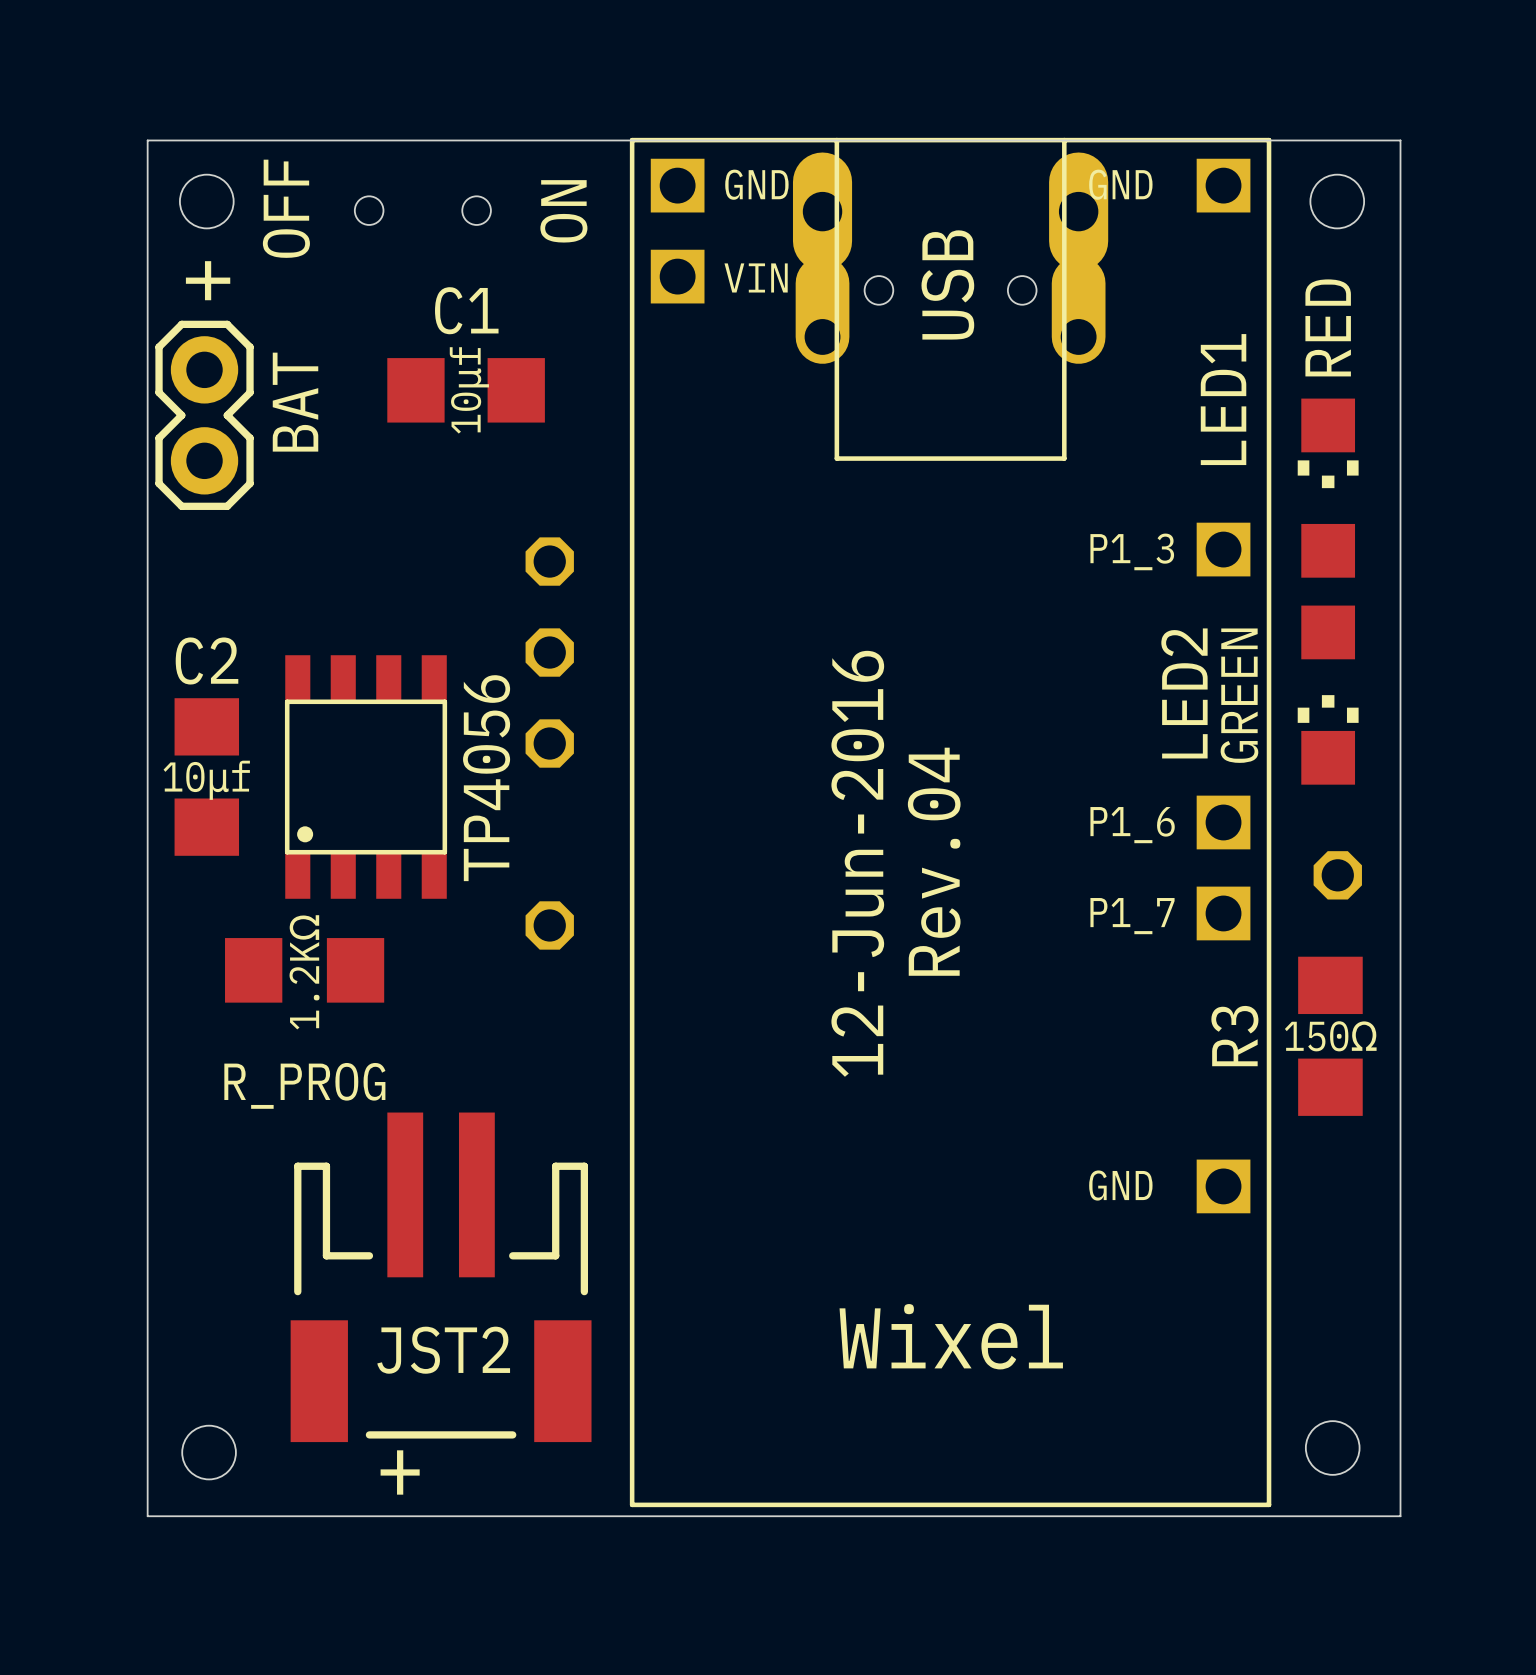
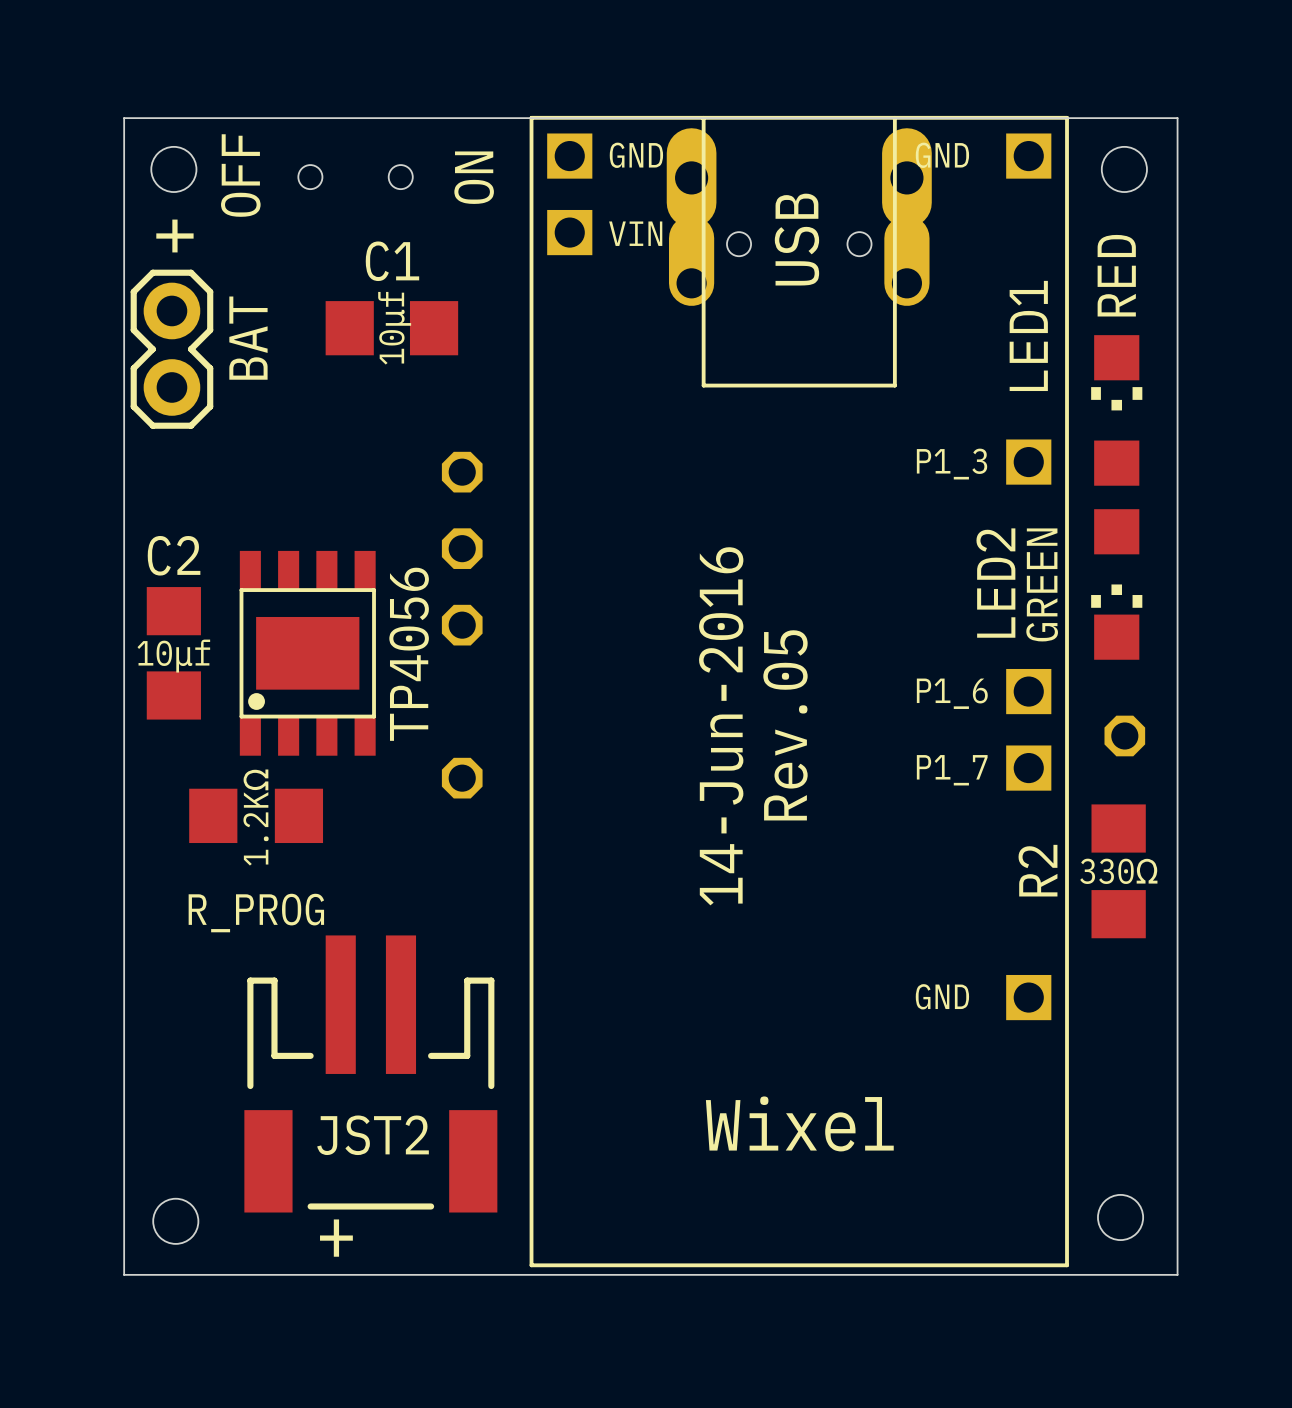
TP4056 footprint: [284, 655, 448, 899] -> [239, 550, 376, 756]
text: Rev.04 (934, 861) -> Rev.05 (785, 725)
text: 12-Jun-2016 (857, 863) -> 14-Jun-2016 (721, 726)
R3 name: R3 (1234, 1036) -> R2 (1037, 870)
R3 value: 150Ω (1330, 1036) -> 330Ω (1118, 871)

